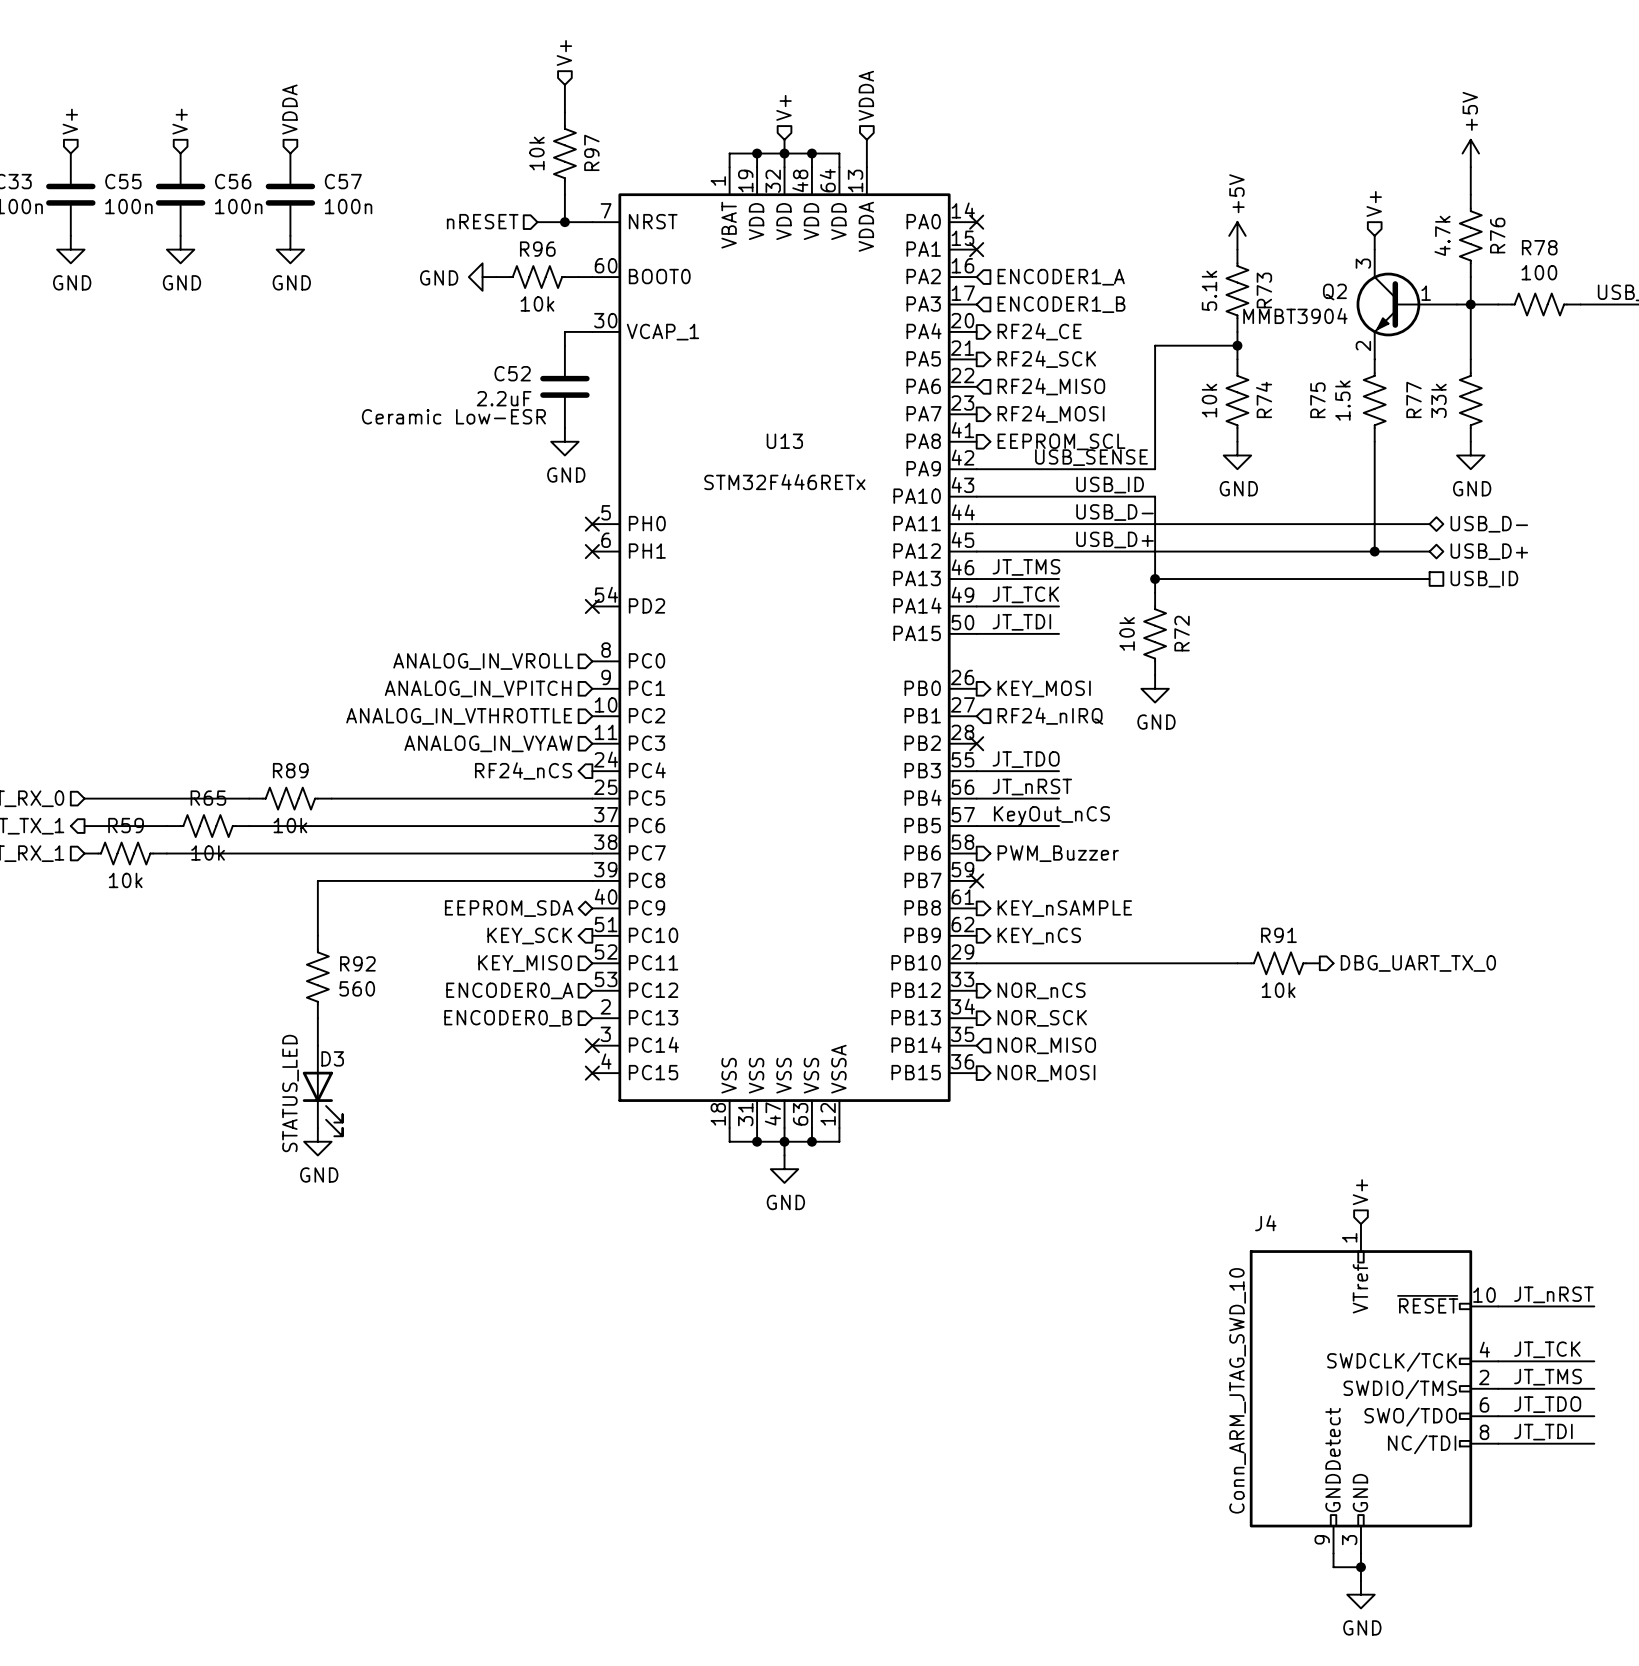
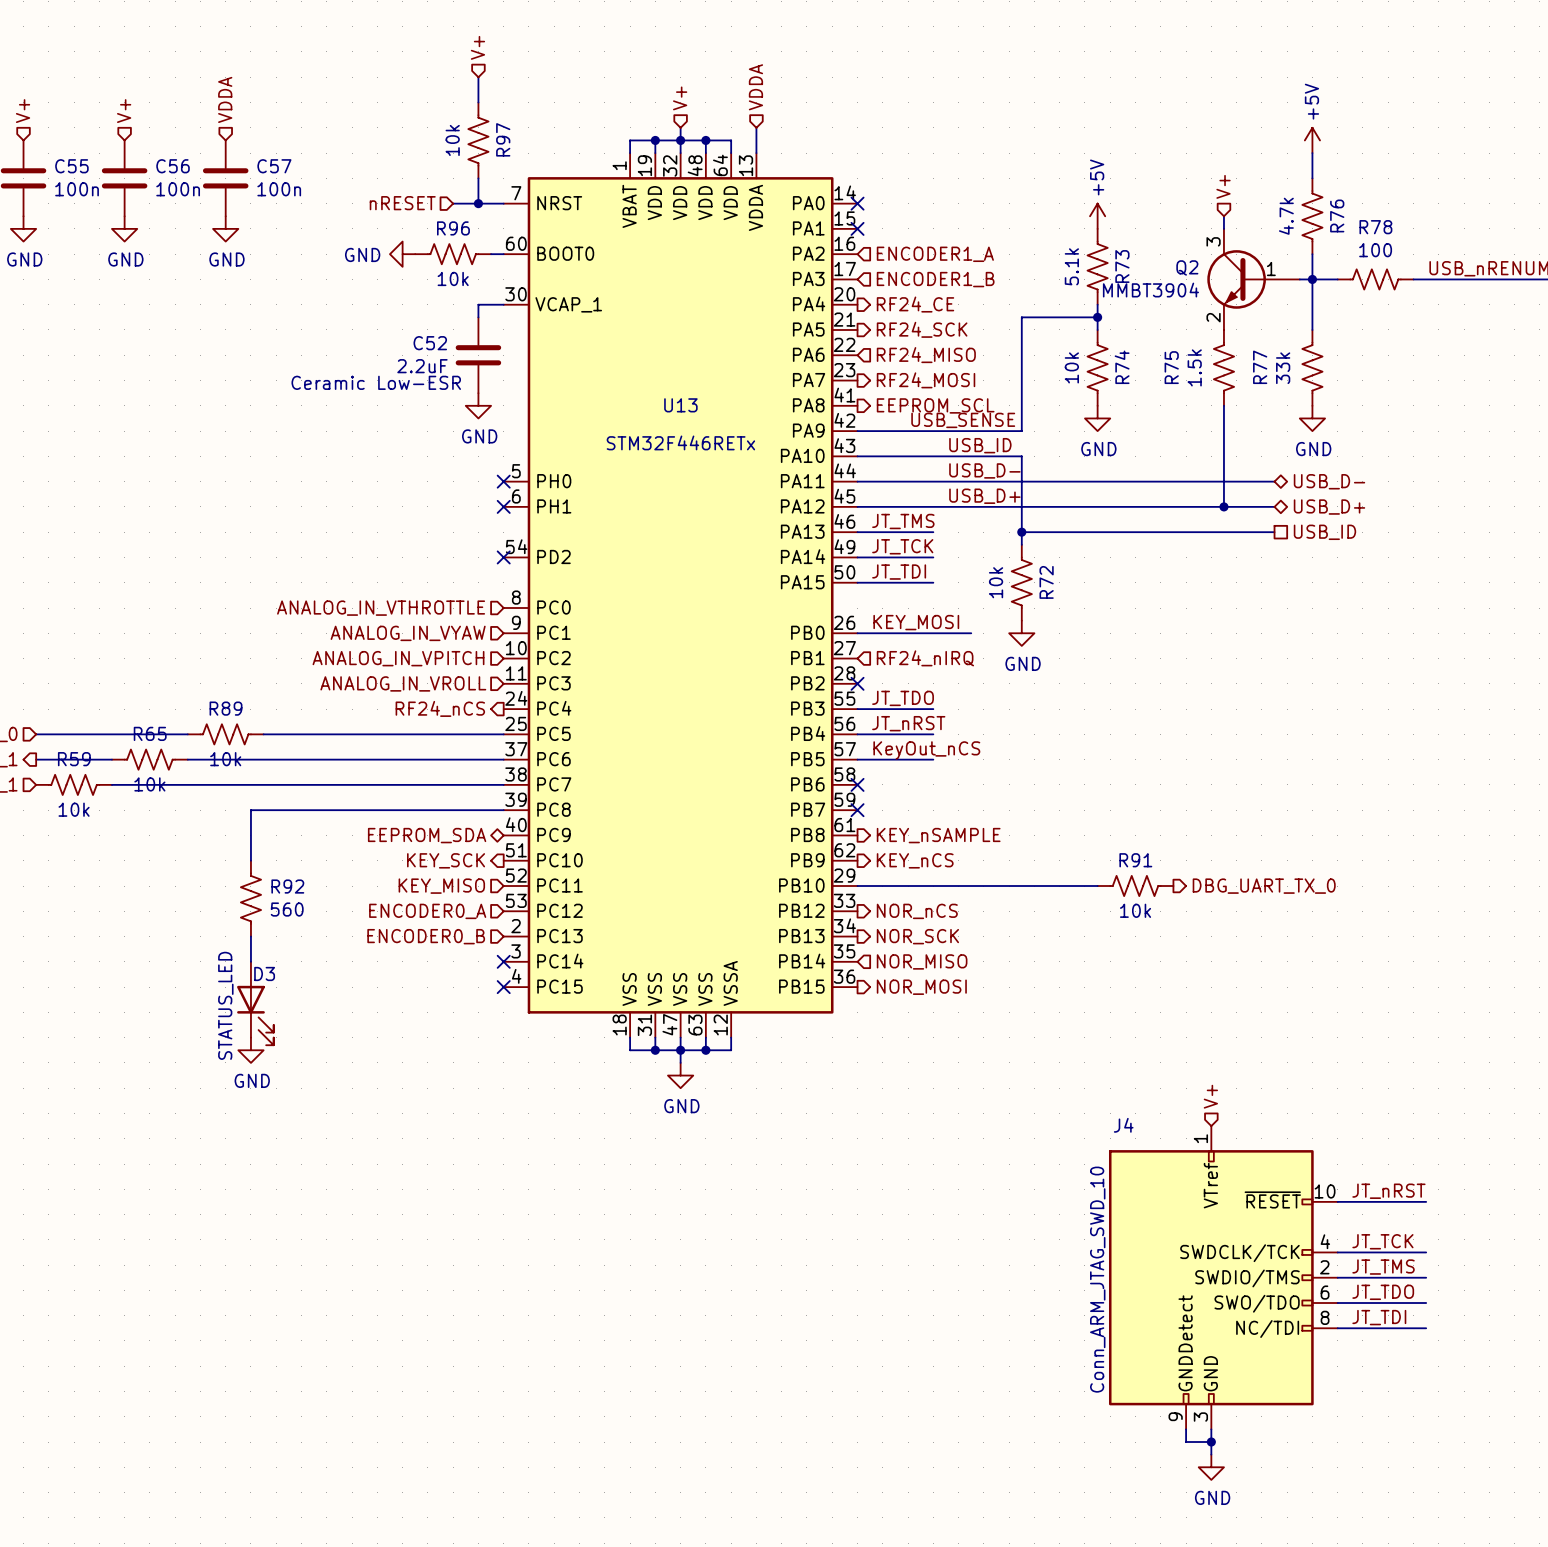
hierarchical label: ANALOG_IN_VROLL (483, 661) -> ANALOG_IN_VTHROTTLE (381, 608)
label: none -> KEY_MOSI (916, 622)
hierarchical label: ANALOG_IN_VPITCH (478, 688) -> ANALOG_IN_VYAW (408, 633)
wire: none -> (857, 633) (971, 633)
hierarchical label: KEY_MOSI (1044, 688) -> none
hierarchical label: ANALOG_IN_VTHROTTLE (459, 716) -> ANALOG_IN_VPITCH (398, 658)
hierarchical label: ANALOG_IN_VYAW (488, 743) -> ANALOG_IN_VROLL (403, 683)
no-connect mark: none -> (857, 784)
hierarchical label: PWM_Buzzer (1058, 853) -> none

